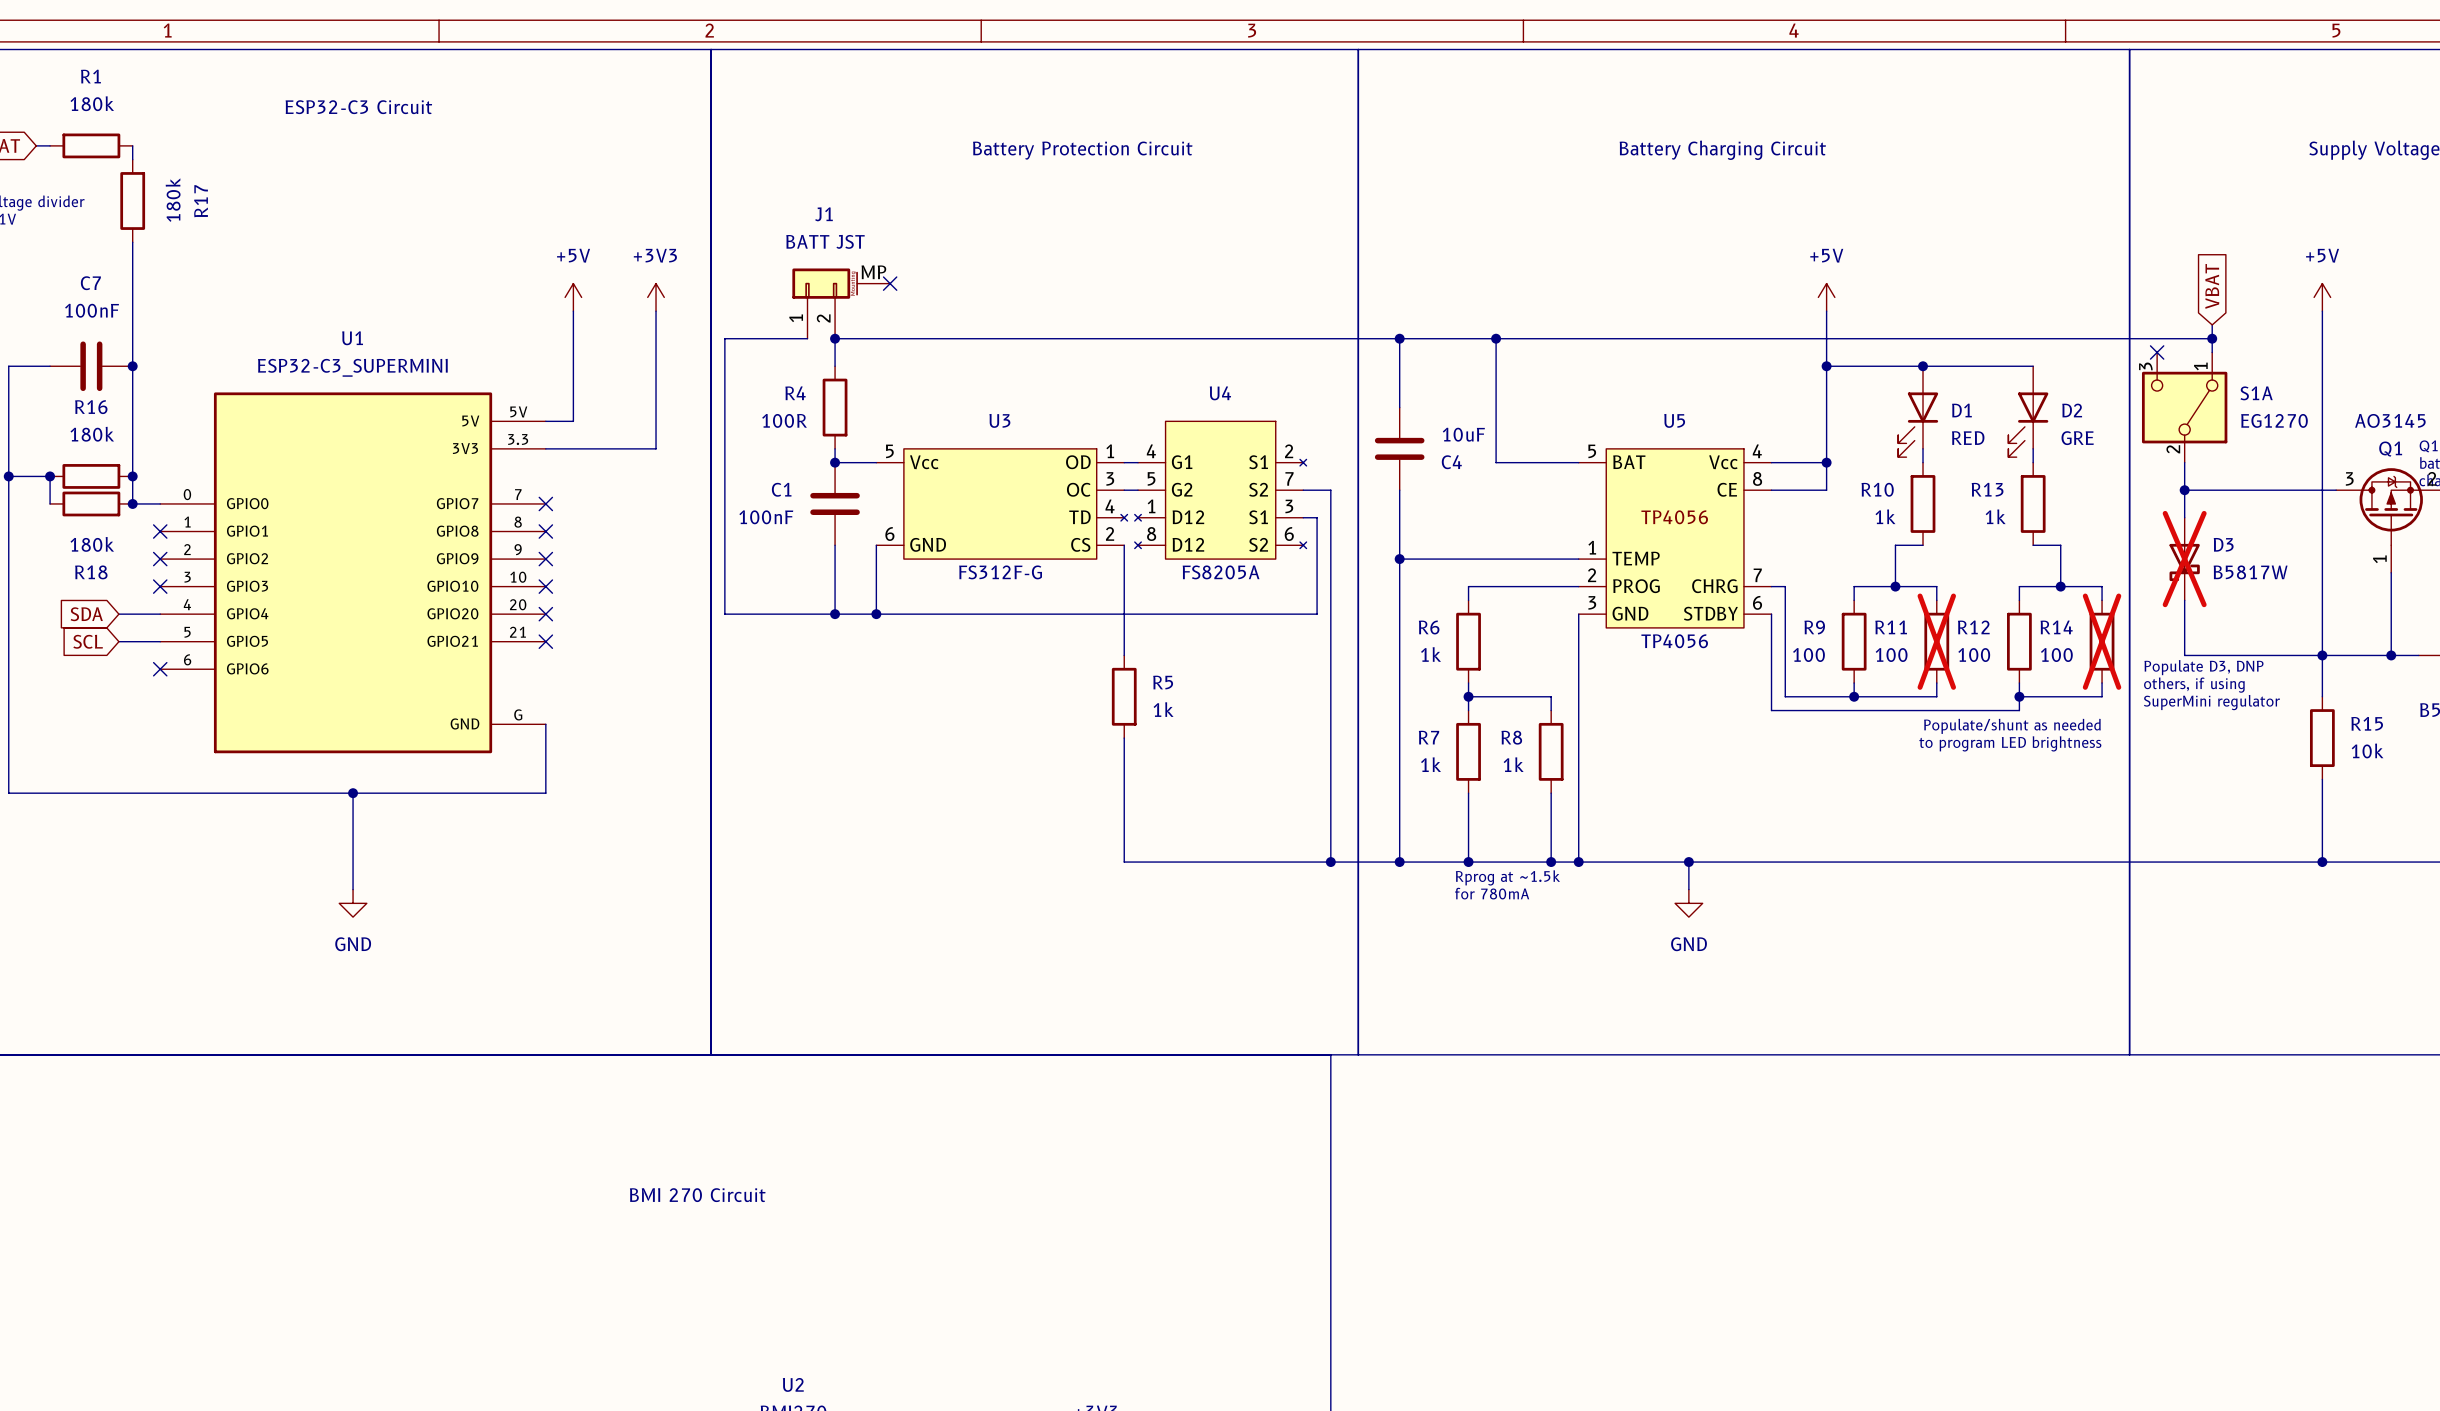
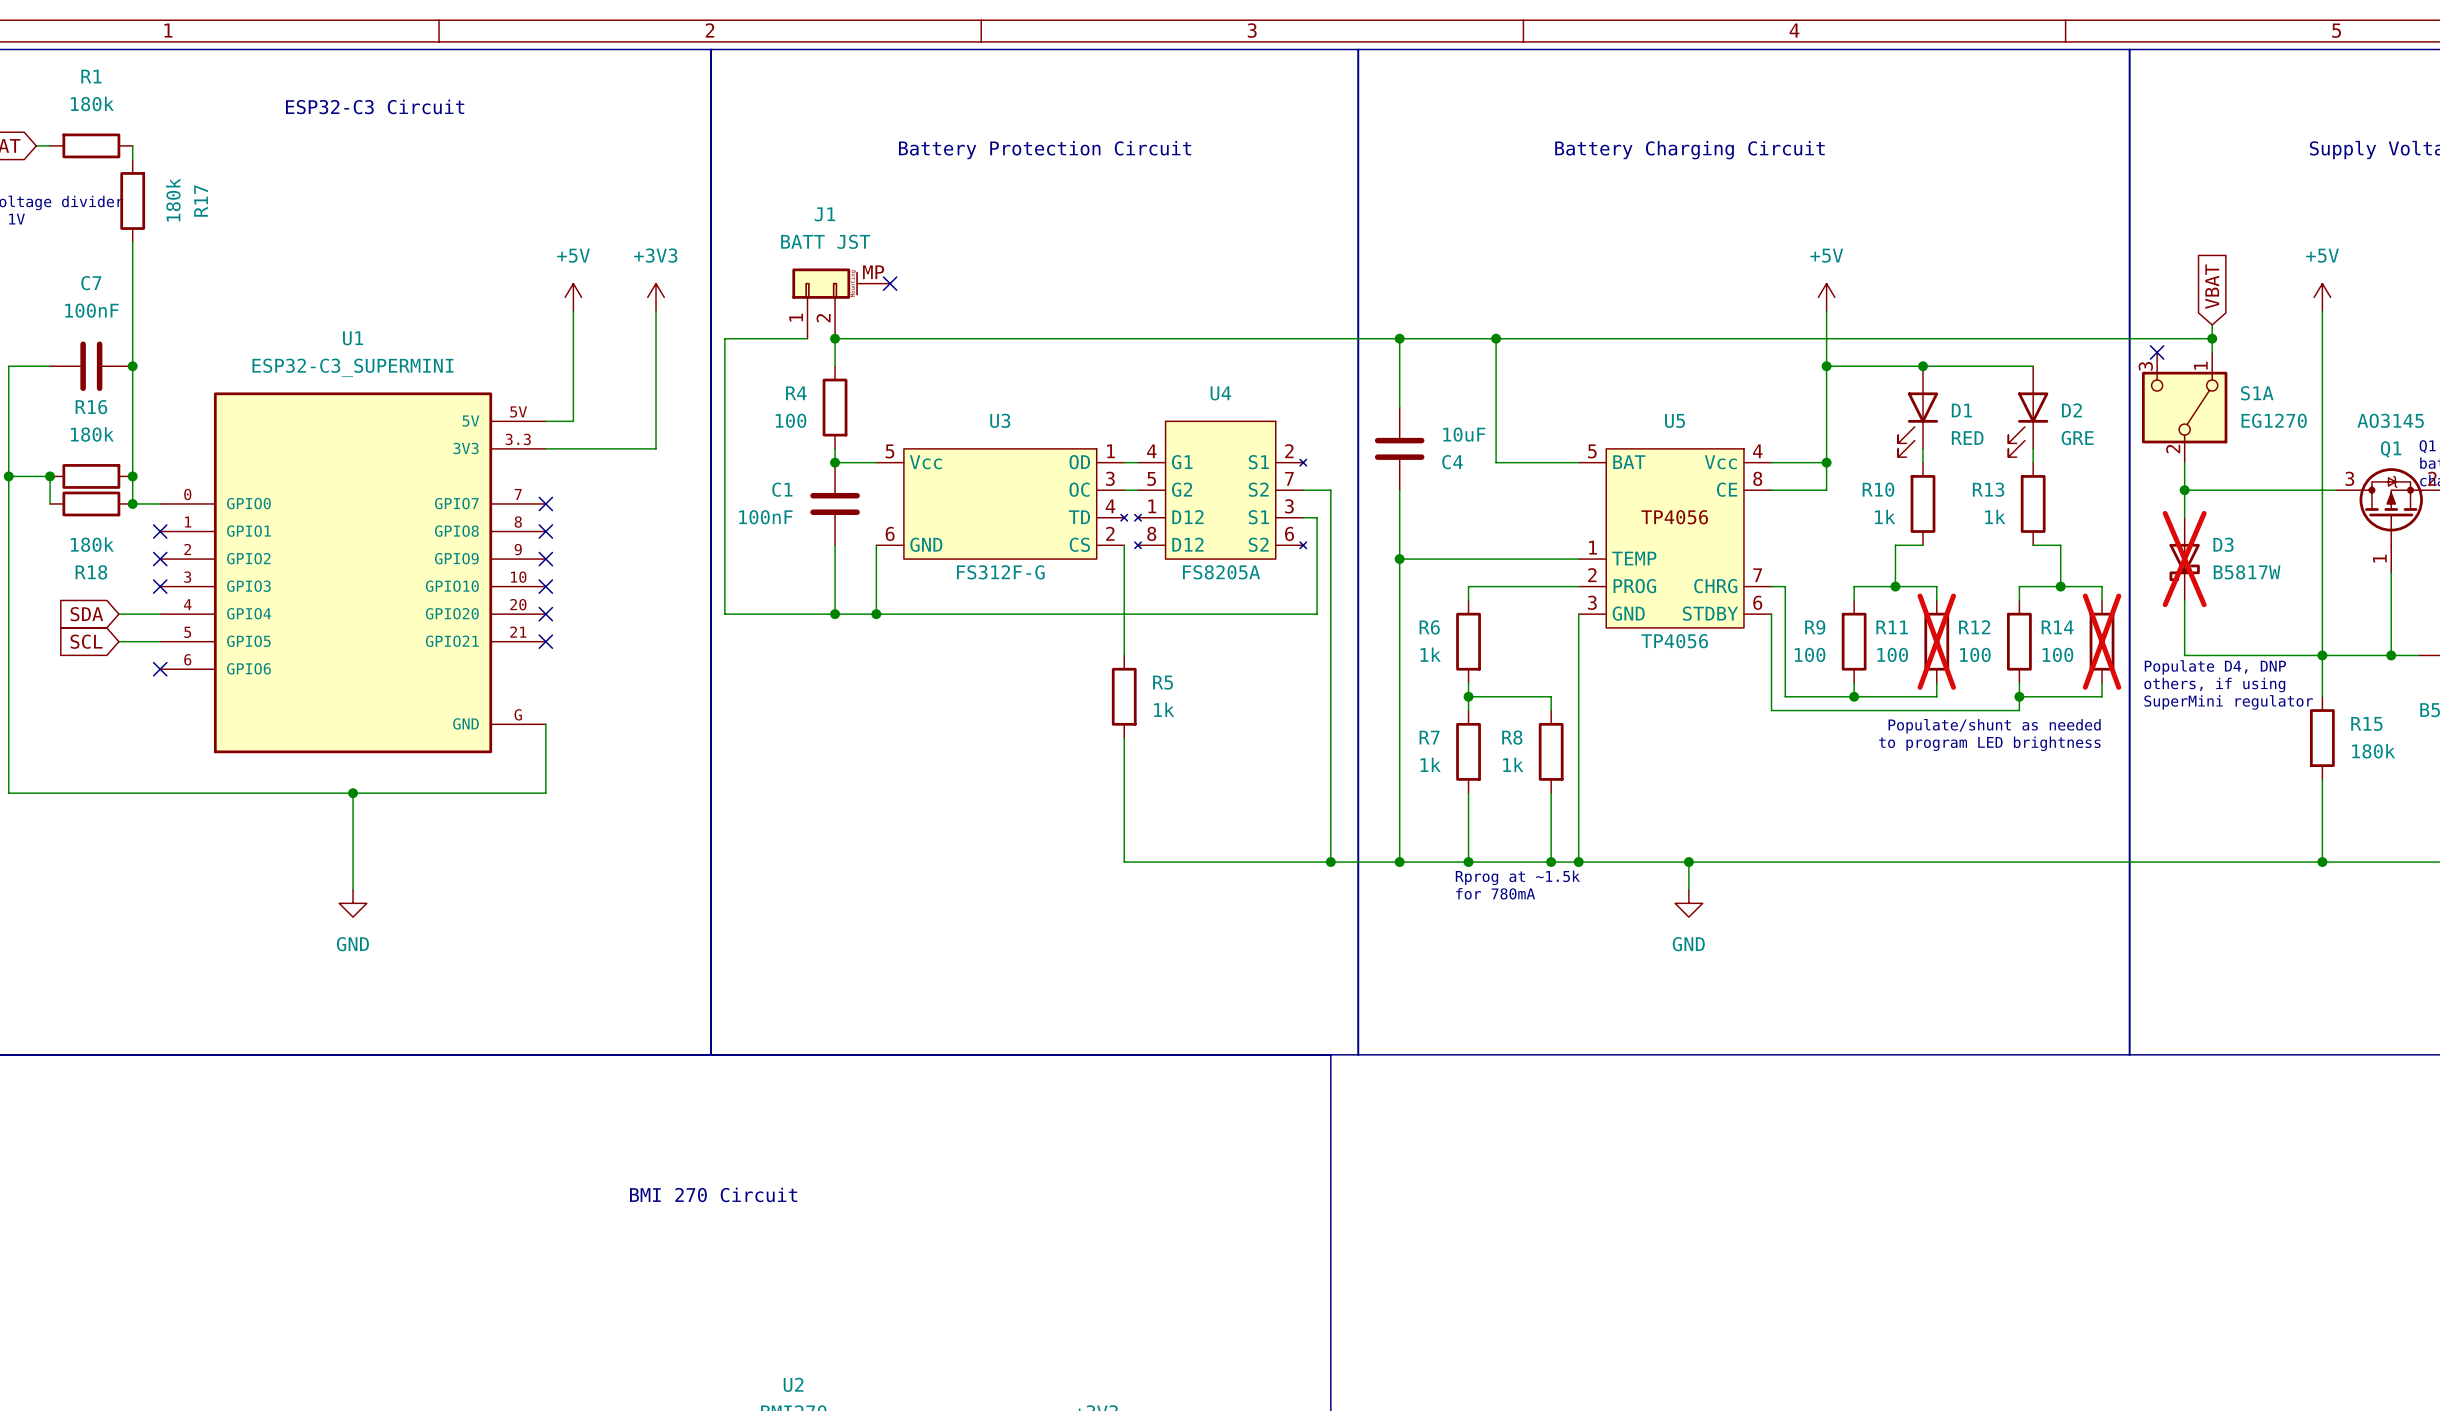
R4 value: 100R (784, 420) -> 100 (790, 420)
text: Populate D3, DNP (2203, 667) -> Populate D4, DNP (2215, 667)
R15 value: 10k (2367, 750) -> 180k (2373, 751)

